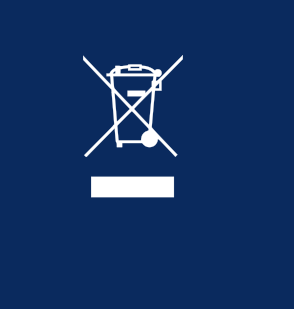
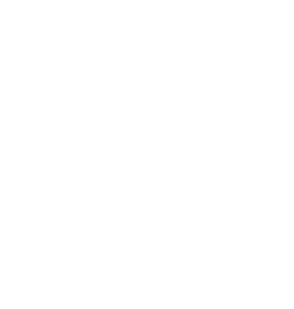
drawing: [83, 54, 183, 198] -> none

